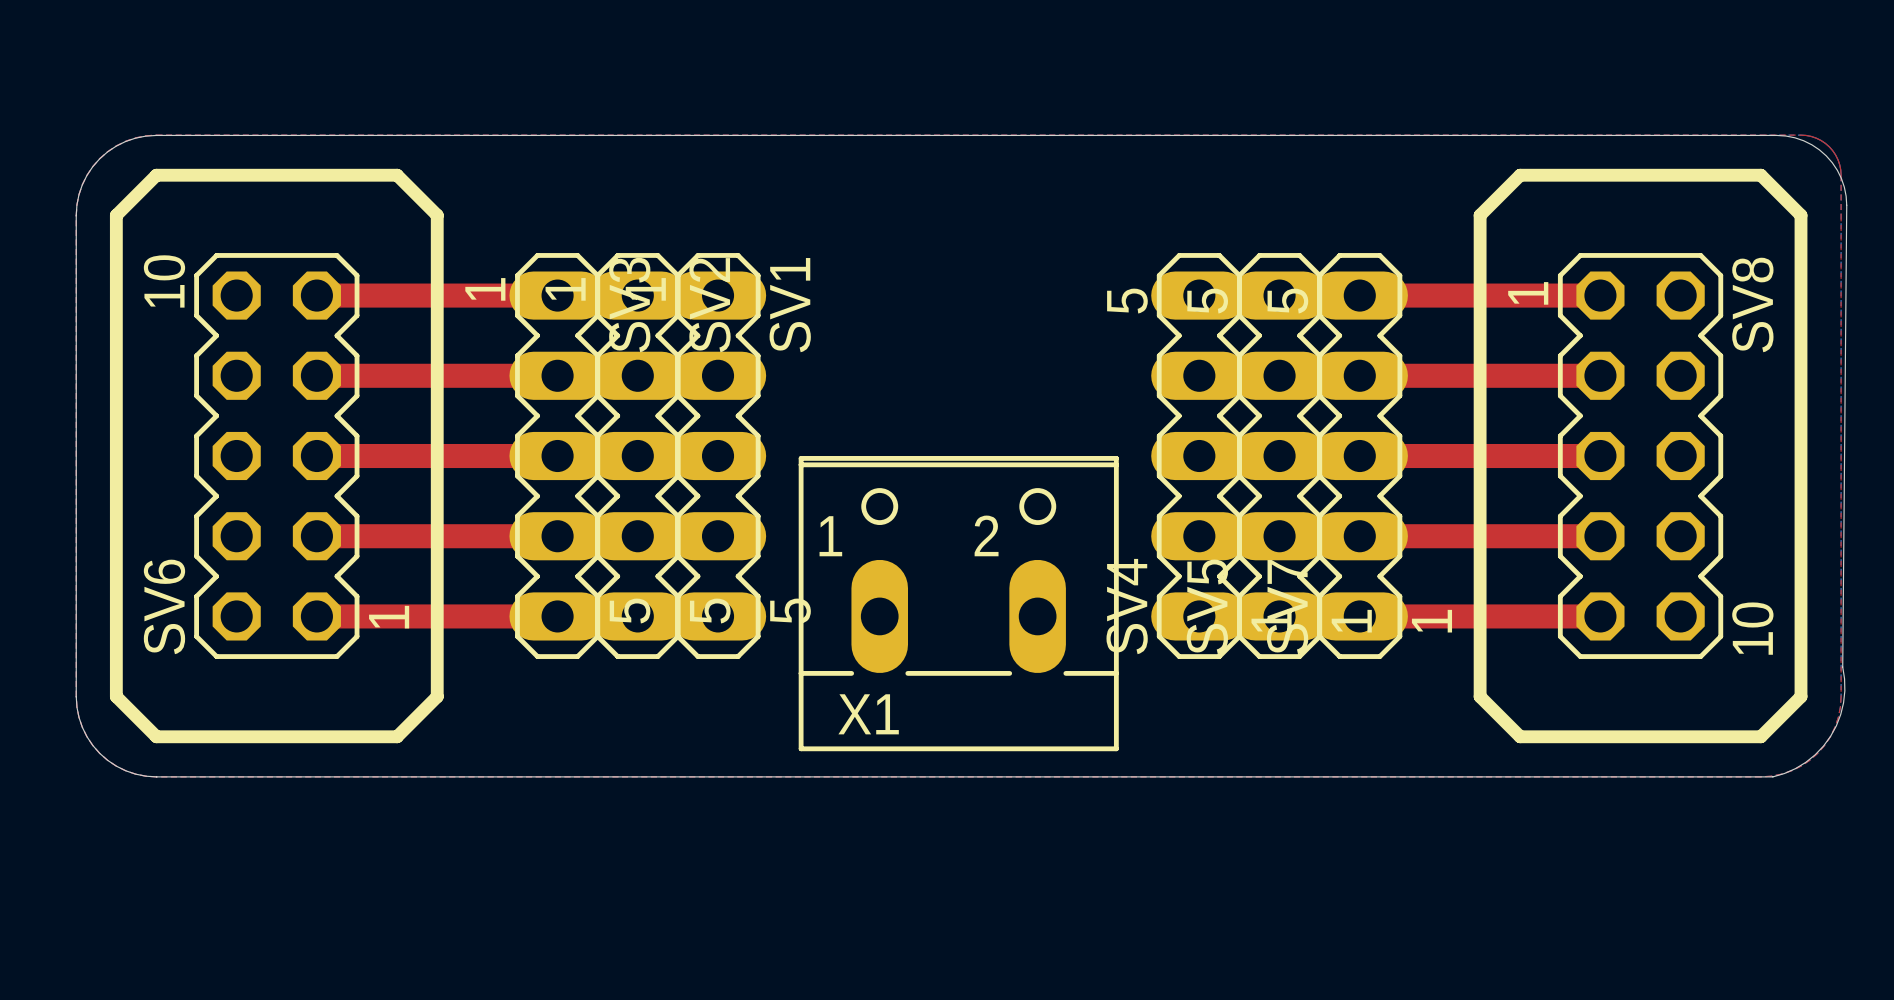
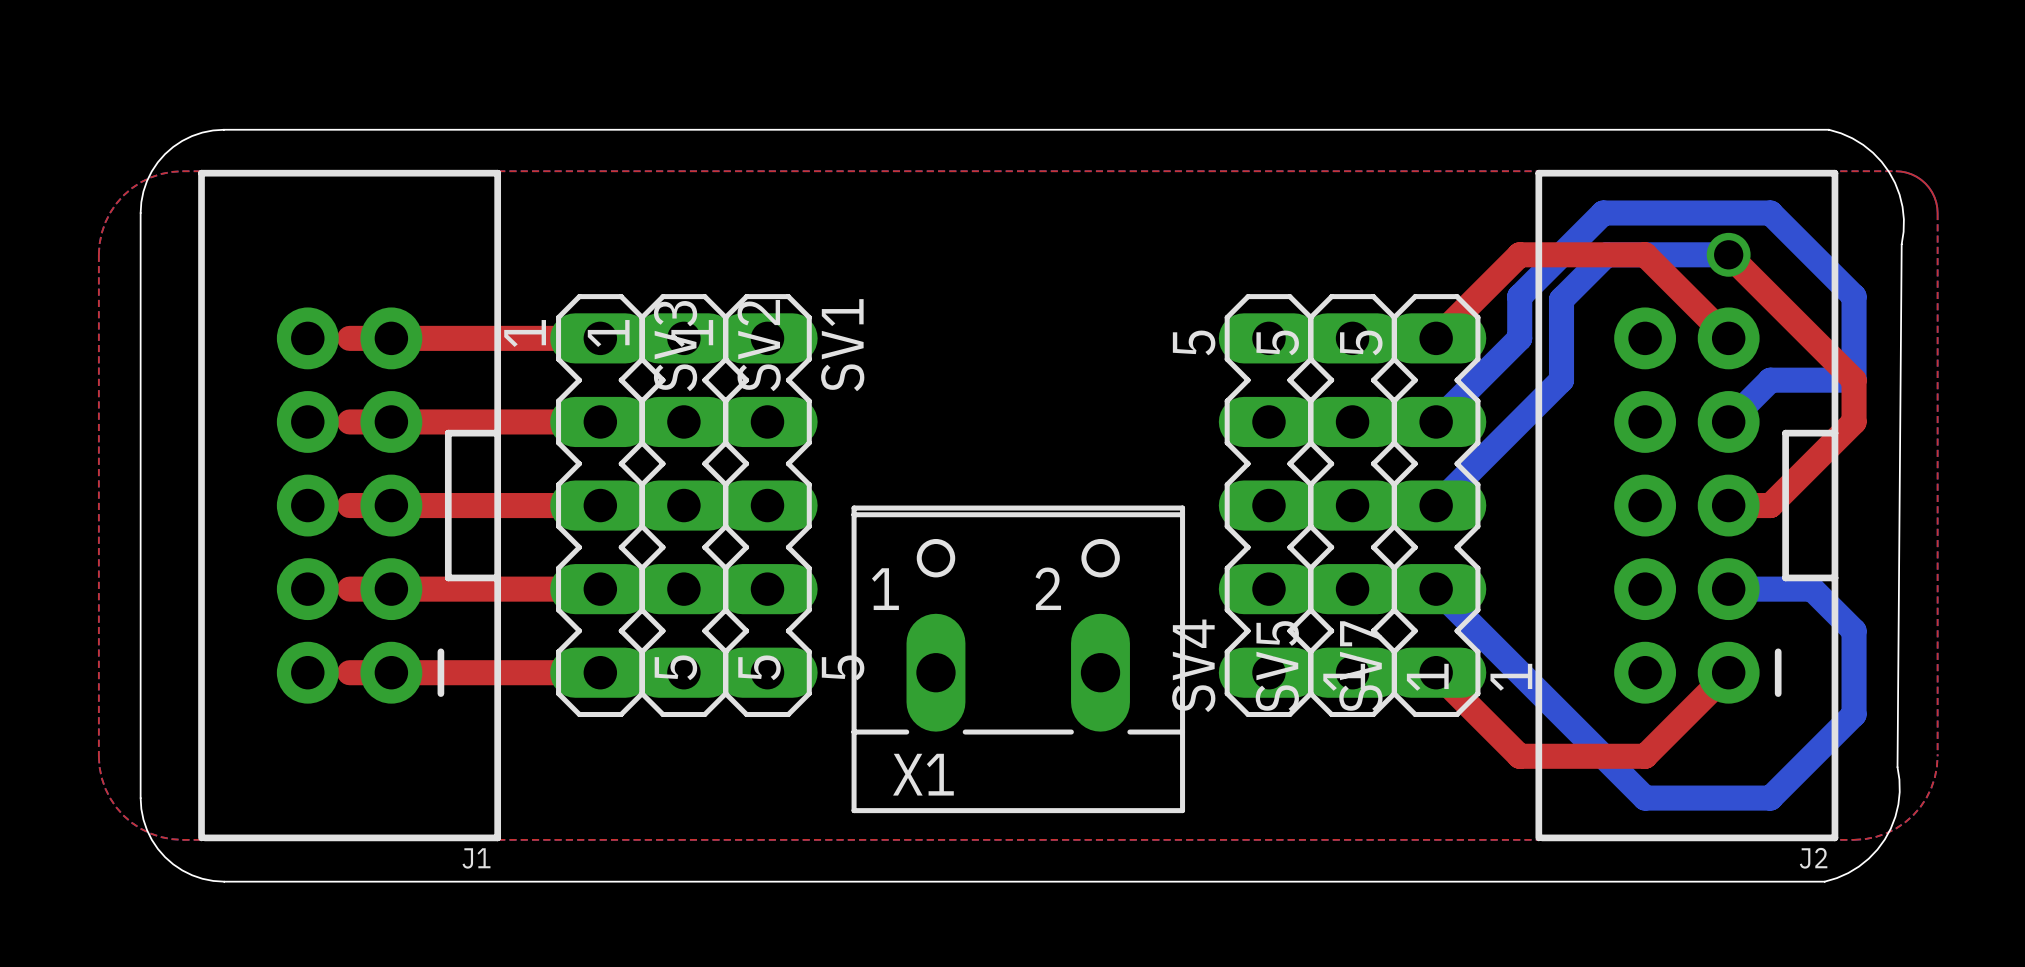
board edge: (156, 135) (1776, 135) (1803, 140) (1819, 149) (1832, 162) (1841, 178) (1846, 205) (1842, 666) (1844, 690) (1840, 714) (1830, 736) (1815, 754) (1795, 768) (1772, 776) (156, 776) (125, 770) (107, 760) (92, 745) (82, 727) (76, 707) (76, 215) (82, 184) (99, 158) (125, 141) (156, 135) -> (223, 129) (192, 136) (165, 154) (146, 181) (140, 213) (141, 808) (147, 830) (157, 848) (173, 864) (192, 875) (224, 881) (1824, 881) (1836, 878) (1859, 866) (1877, 849) (1890, 828) (1898, 804) (1899, 792) (1897, 767) (1901, 244) (1903, 219) (1902, 206) (1895, 182) (1881, 161) (1863, 144) (1841, 133) (1828, 129) (223, 129)
line: (156, 175) (116, 215) (116, 696) (156, 736) (397, 736) (437, 696) (437, 215) (397, 175) (156, 175) -> none
line: (1520, 175) (1760, 175) (1801, 215) (1801, 696) (1760, 736) (1520, 736) (1480, 696) (1480, 215) (1520, 175) -> none
top track: none -> (1728, 254) (1854, 380) (1854, 421) (1770, 505) (1728, 505)
bottom track: none -> (1728, 254) (1606, 254) (1561, 299) (1561, 380) (1436, 505)
via: none -> (1728, 254)
top track: (1359, 295) (1600, 295) -> (1436, 338) (1519, 254) (1645, 254) (1728, 338)
top track: (1359, 375) (1600, 375) -> none
bottom track: none -> (1436, 421) (1519, 338) (1519, 296) (1603, 213) (1770, 213) (1854, 296) (1854, 380) (1770, 380) (1728, 421)
SV6: (276, 456) -> none
J1: none -> (349, 505)
top track: (1359, 456) (1600, 456) -> none
J2: none -> (1686, 505)
SV8: (1640, 456) -> none
top track: (1359, 536) (1600, 536) -> none
bottom track: none -> (1436, 589) (1645, 798) (1770, 798) (1854, 714) (1854, 630) (1812, 589) (1728, 589)
top track: (1359, 616) (1600, 616) -> (1436, 672) (1519, 756) (1645, 756) (1728, 672)

